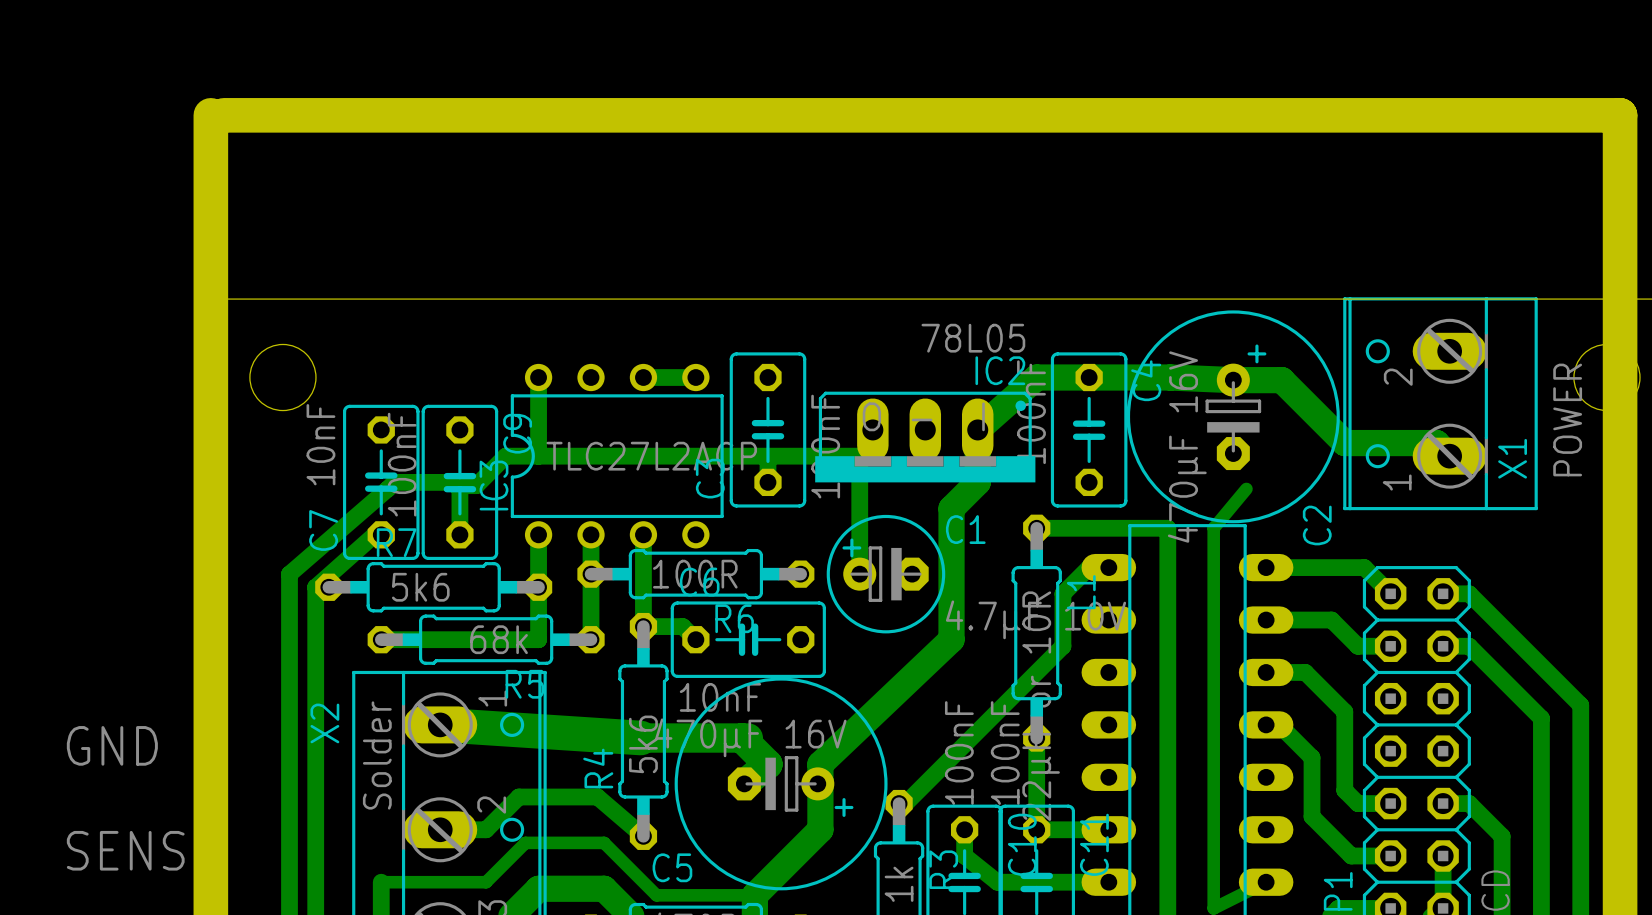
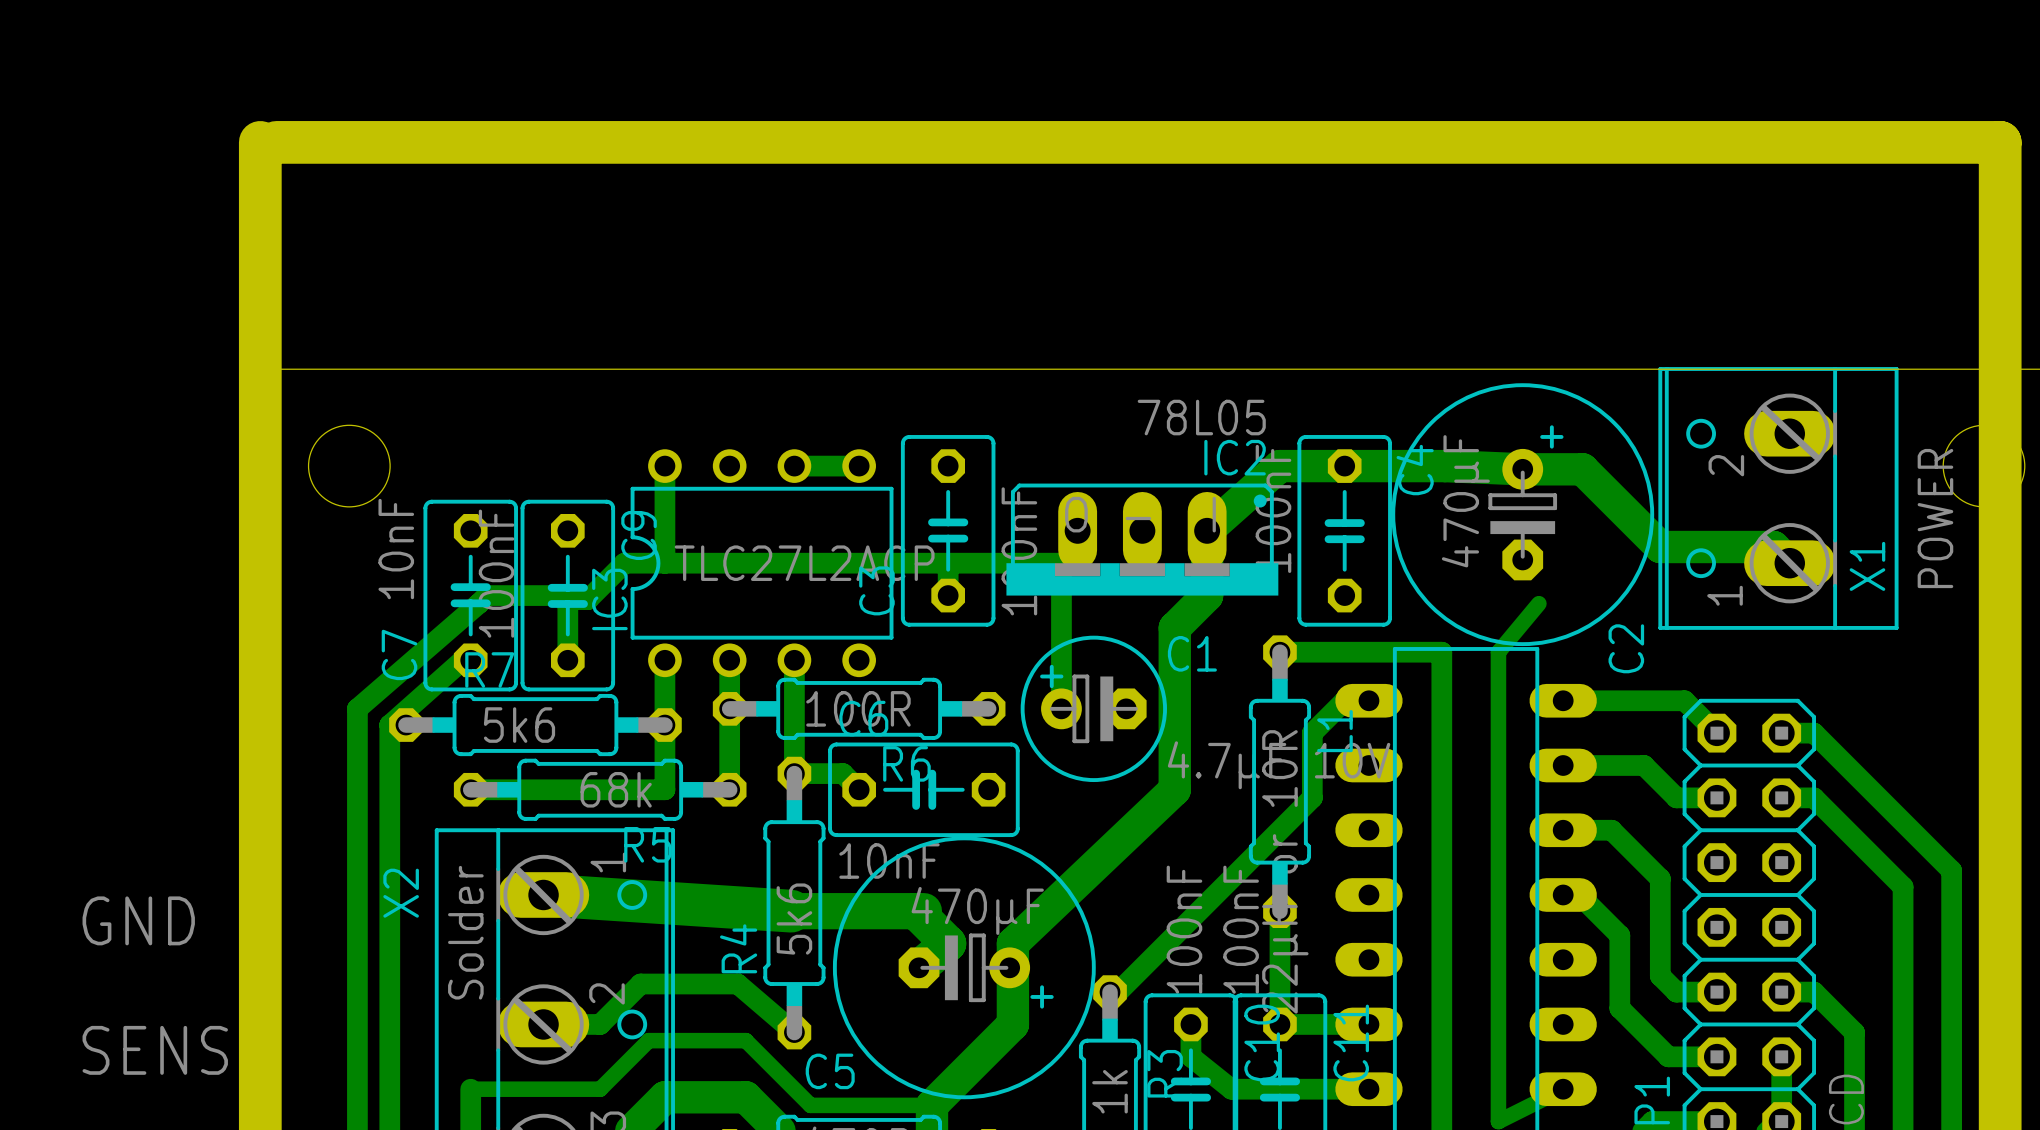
C2 value: 470µF 16V (1187, 447) -> 470µF (1465, 501)
C5 value: 470µF 16V (750, 737) -> 470µF (977, 910)

